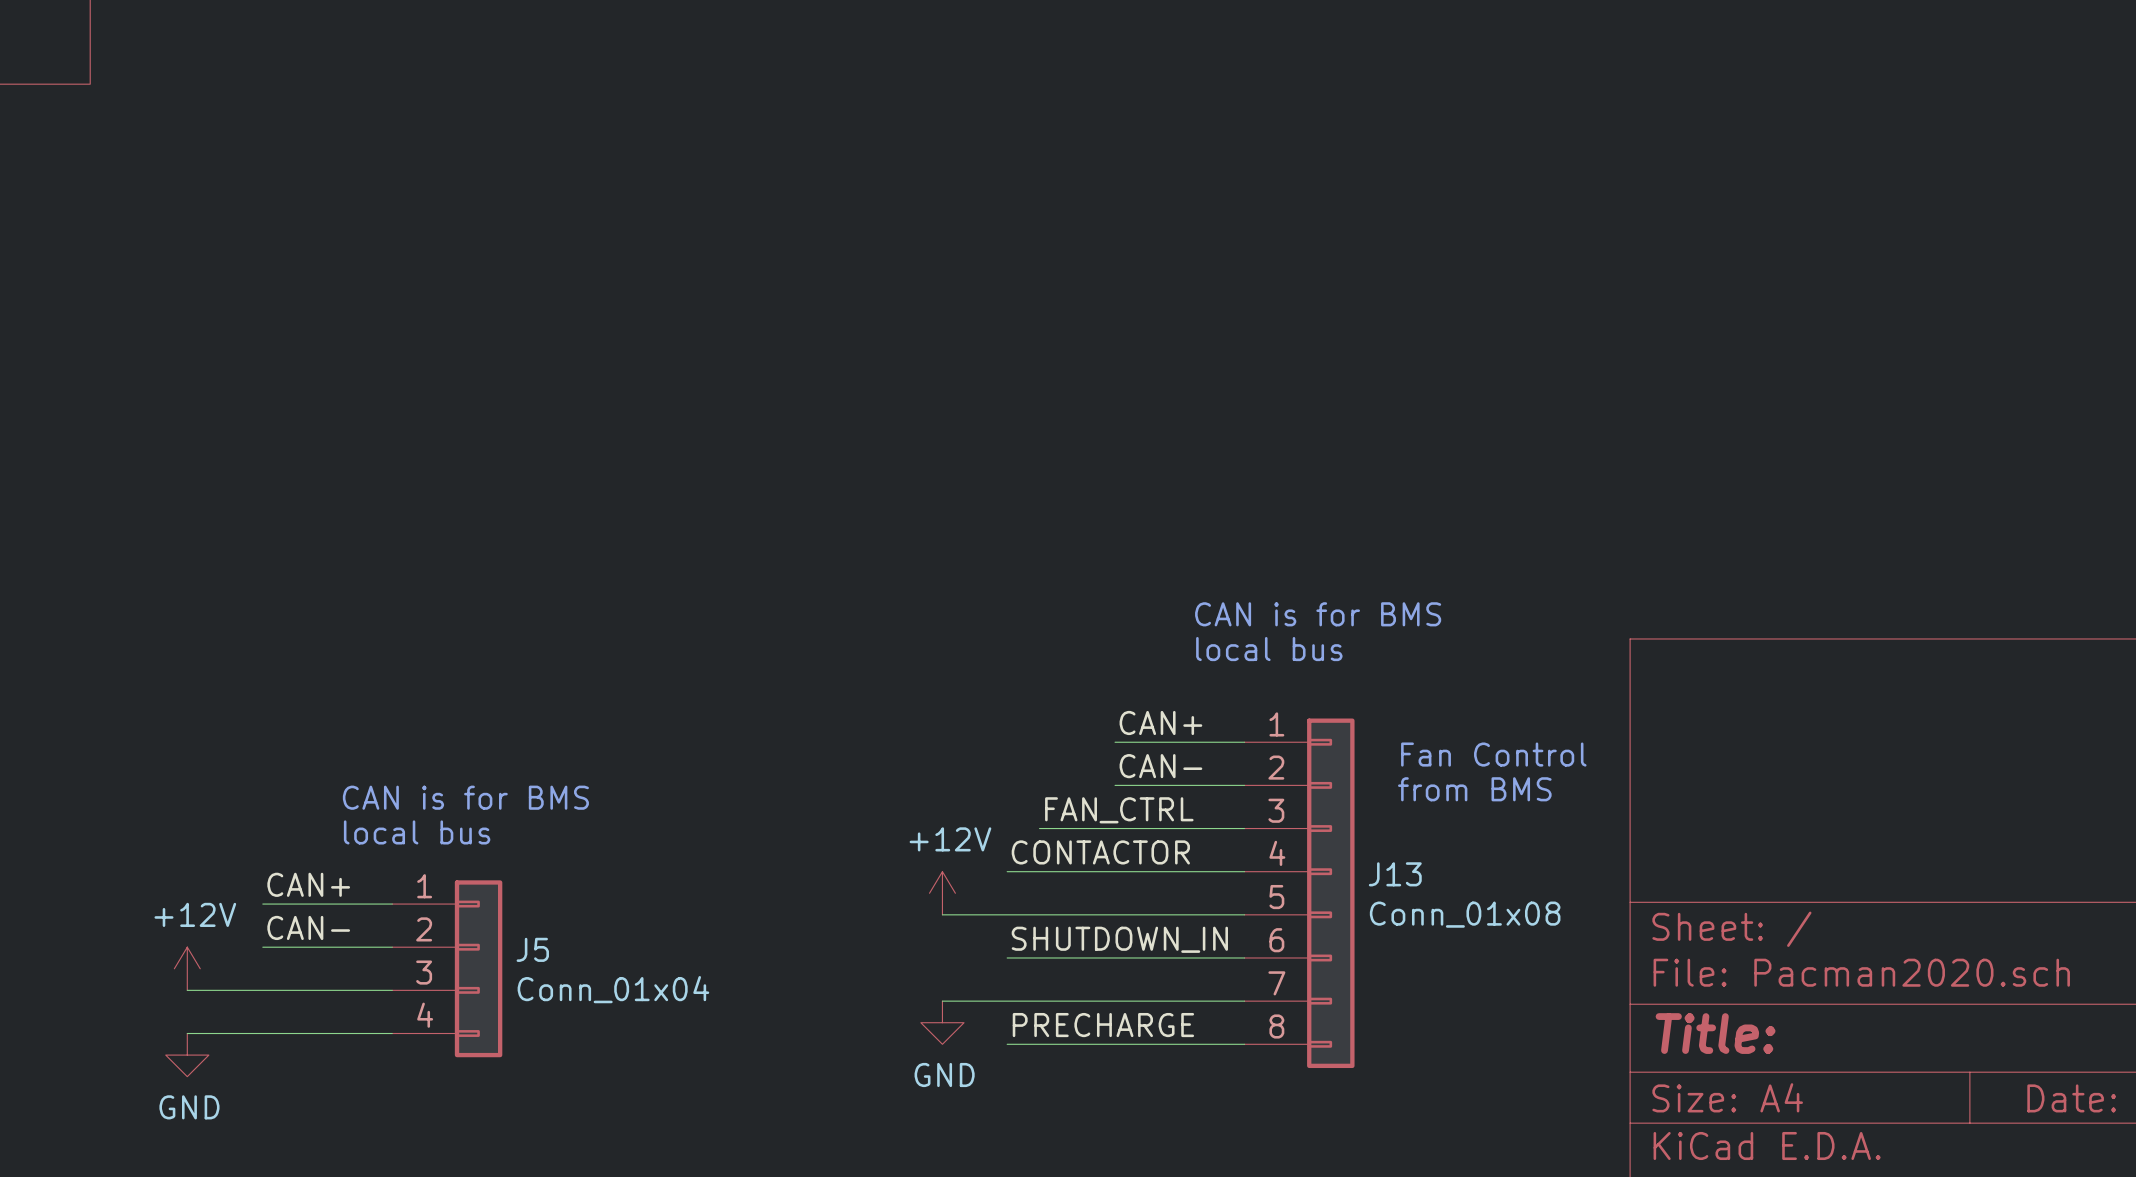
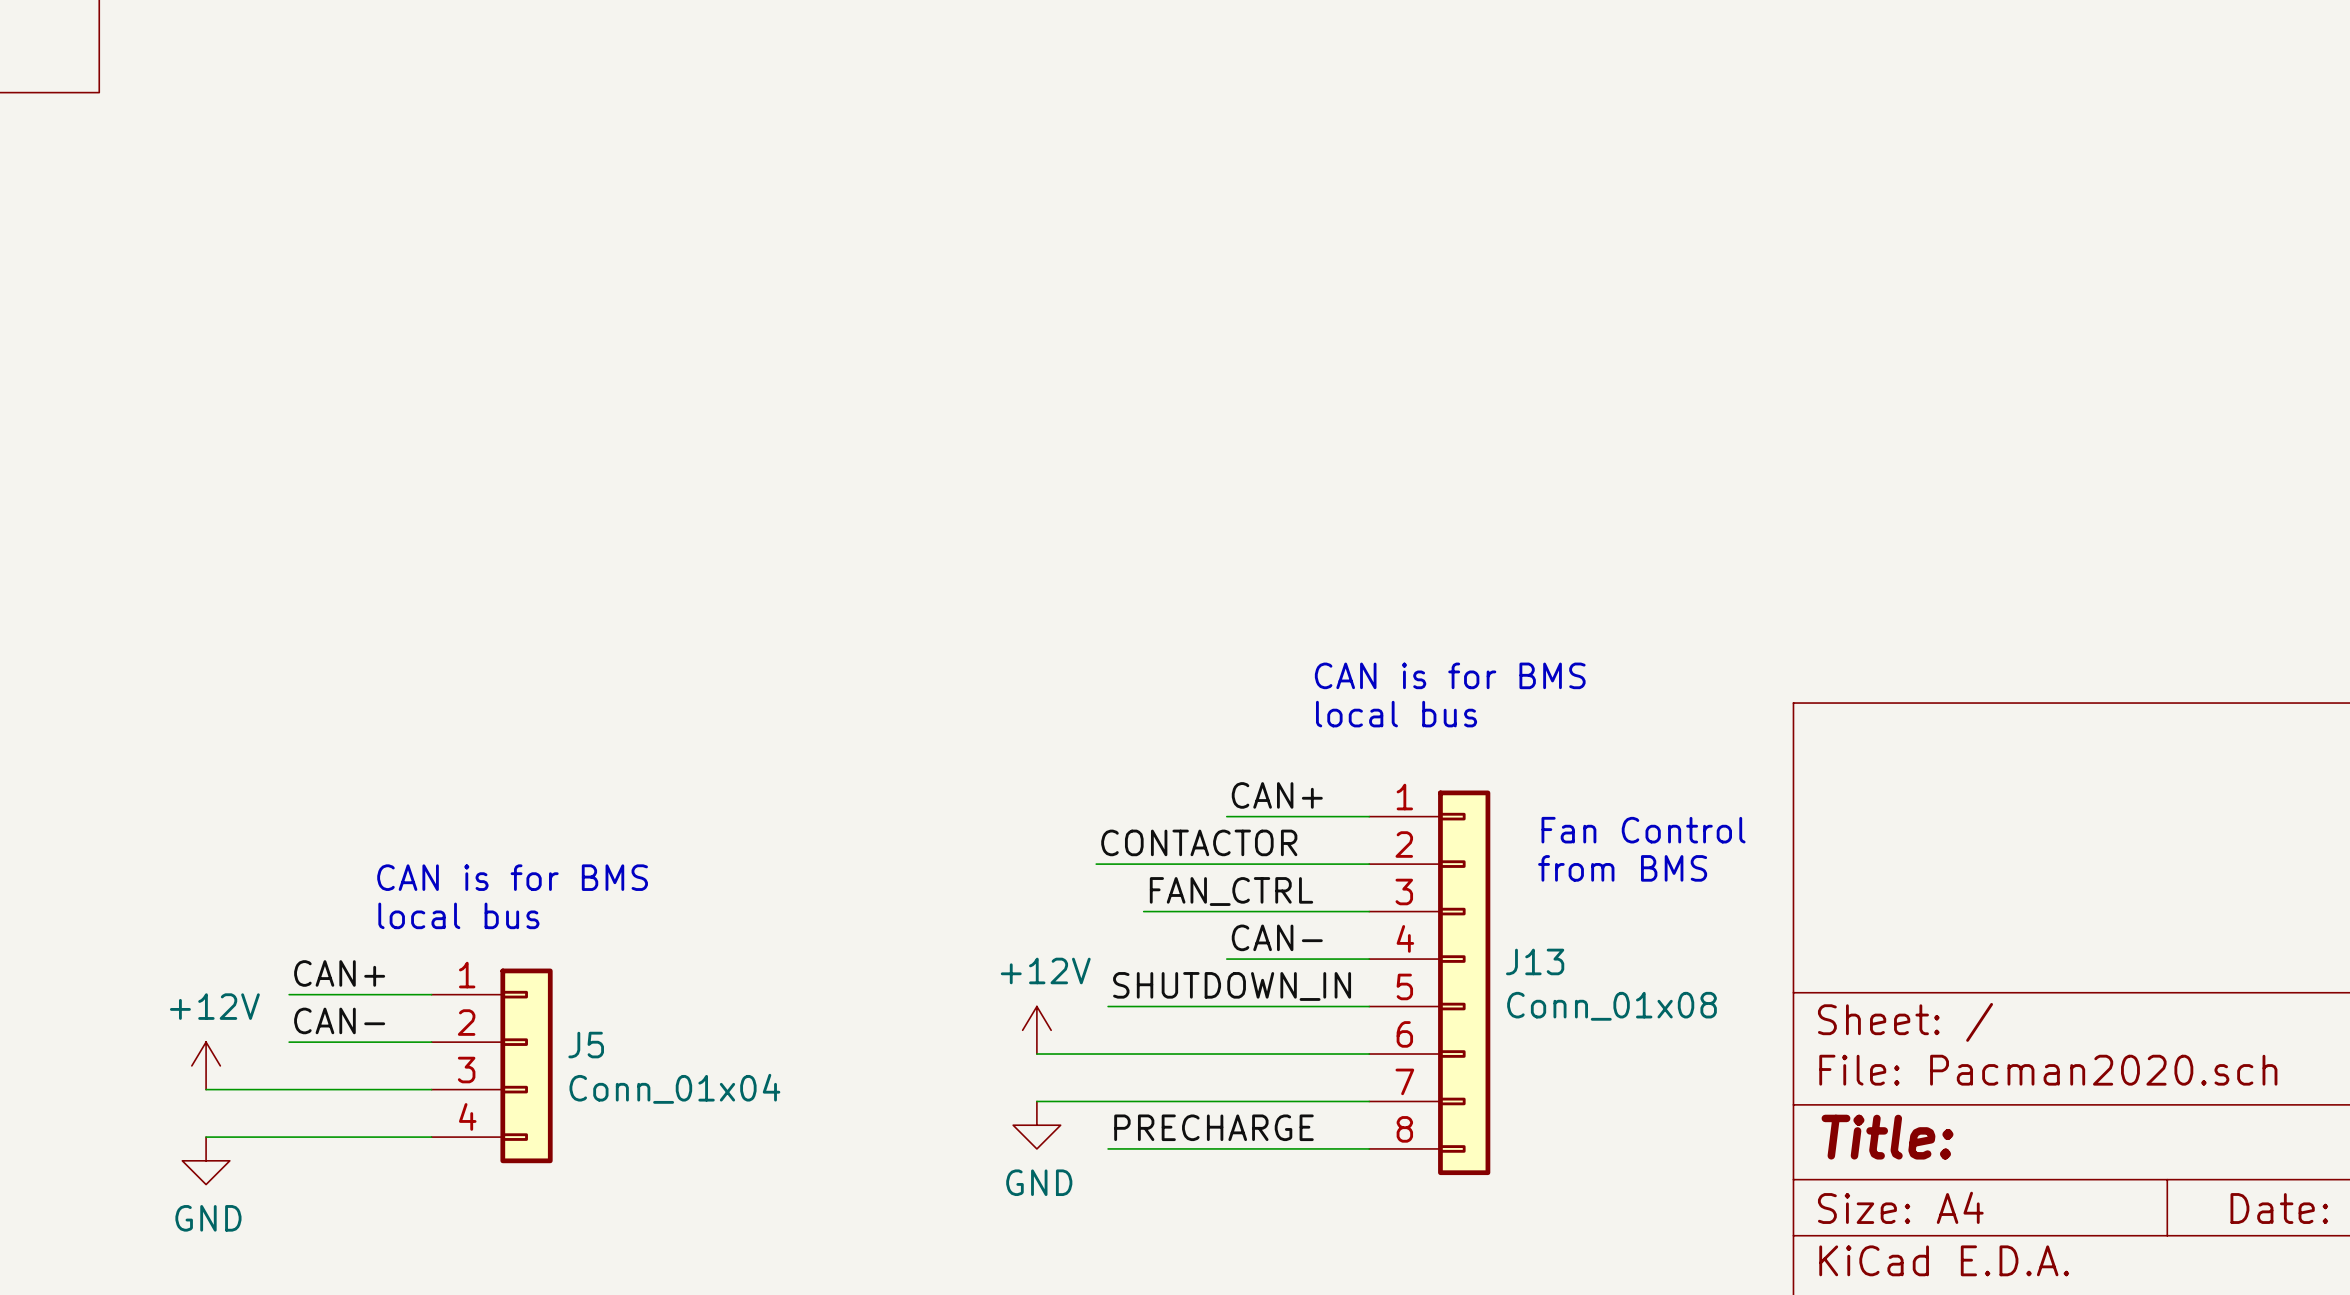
label position: CAN- (1160, 766) -> CAN- (1277, 937)
wire: none -> (1096, 864) (1226, 864)
label position: CONTACTOR (1100, 852) -> CONTACTOR (1199, 842)
wire: (1007, 871) (1115, 871) -> none
power symbol position: +12V (942, 893) -> +12V (1036, 1030)
wire: (942, 914) (1007, 914) -> (1036, 1054) (1108, 1054)
label position: SHUTDOWN_IN (1119, 939) -> SHUTDOWN_IN (1232, 986)

